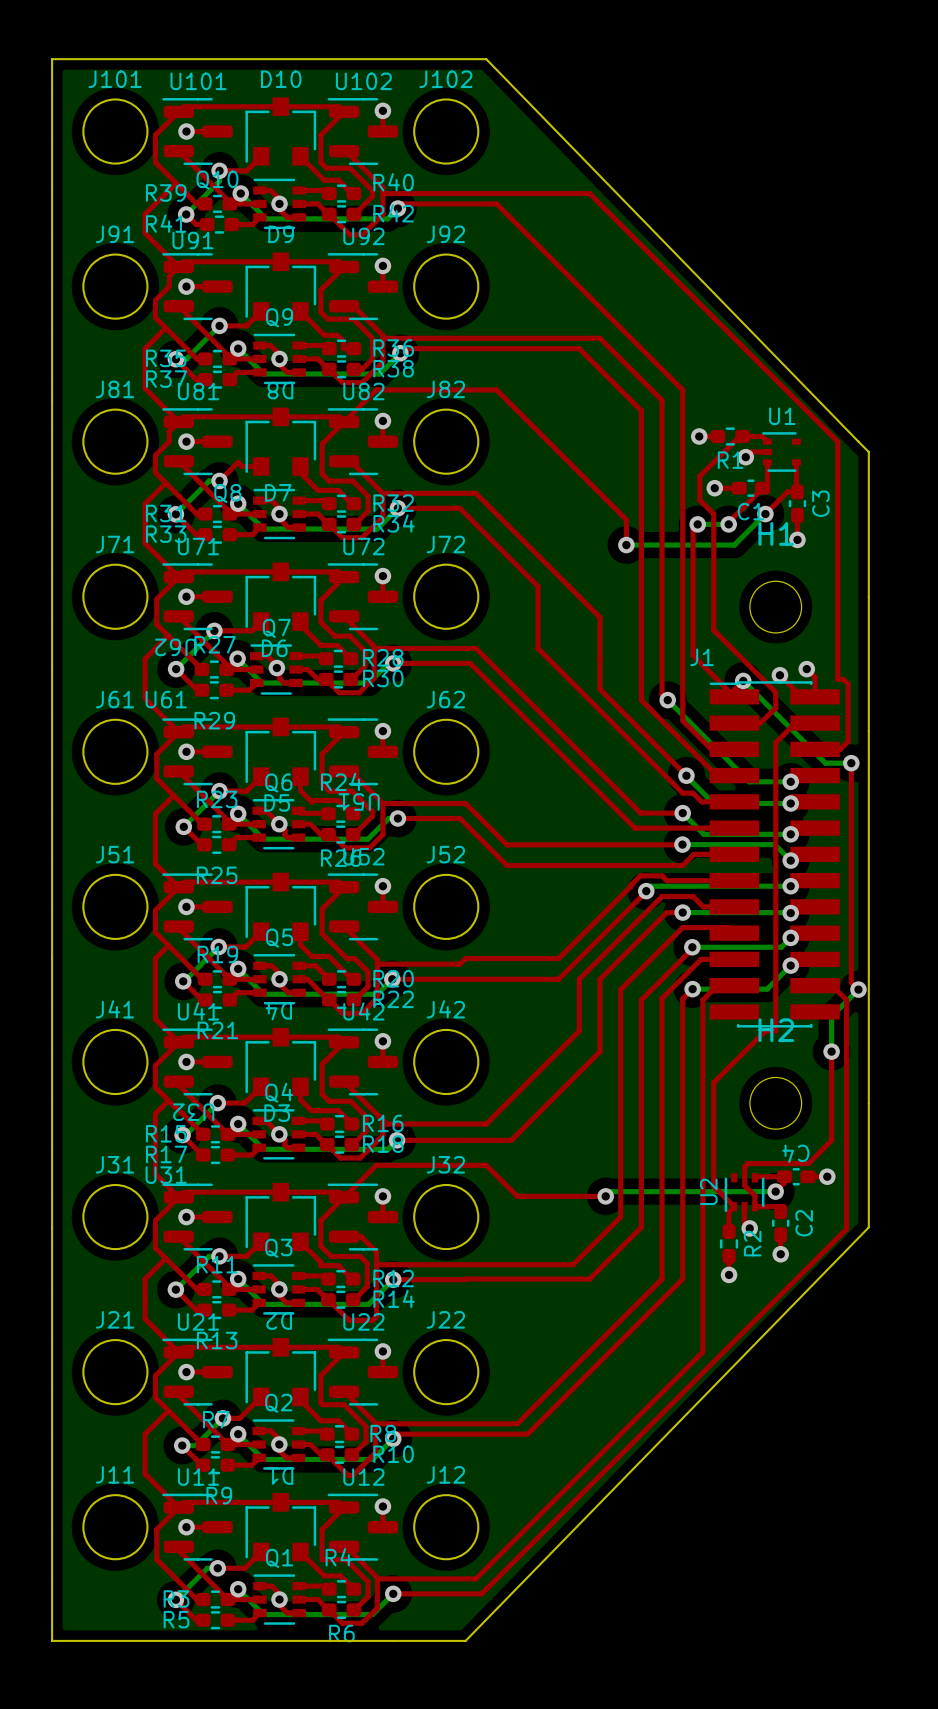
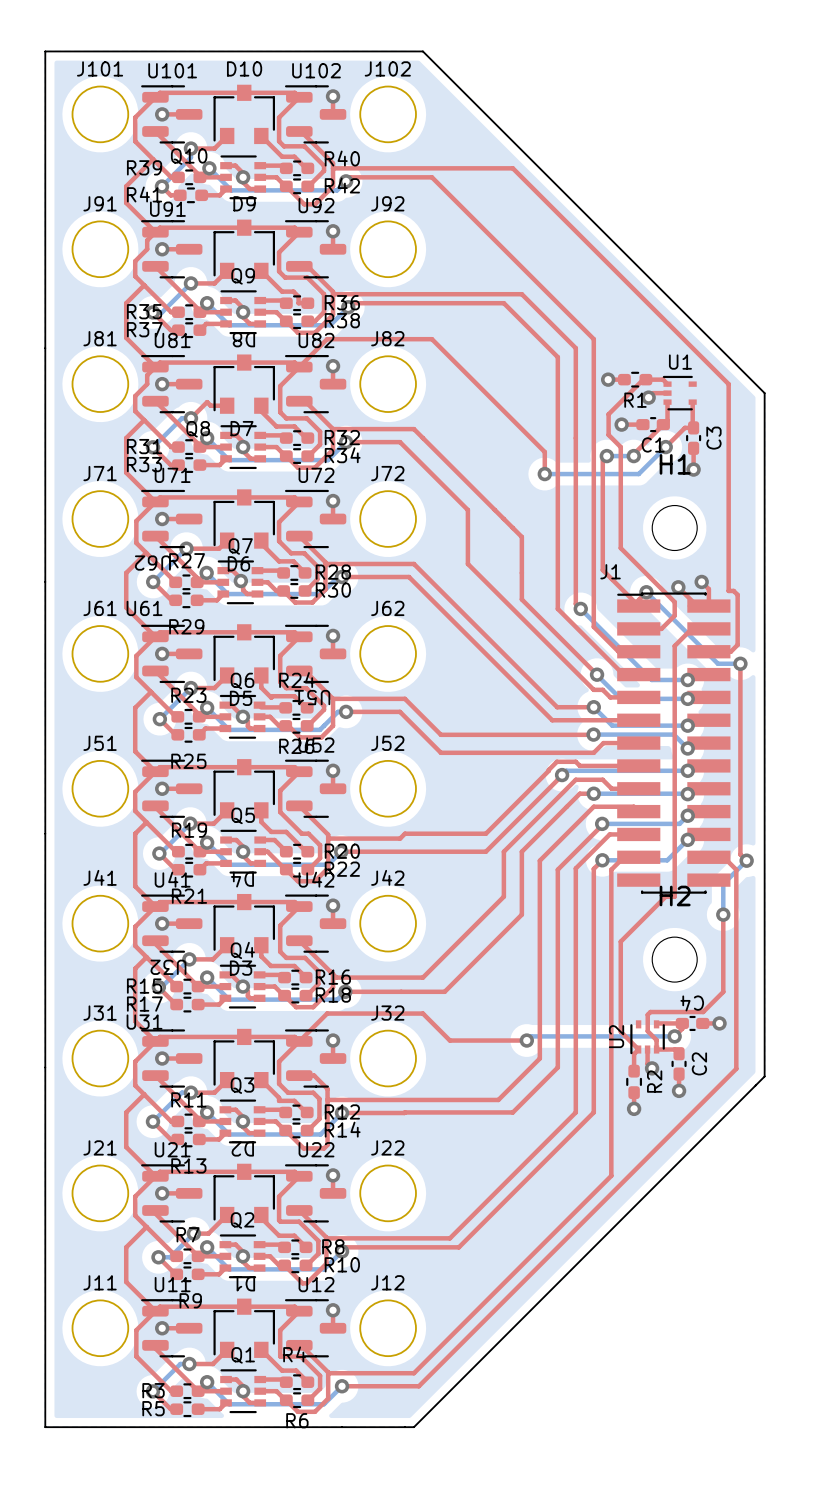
board edge: (486, 59) (868, 452) (868, 1227) (465, 1640) -> (422, 51) (764, 393) (764, 1076) (413, 1427) (404, 1427)

